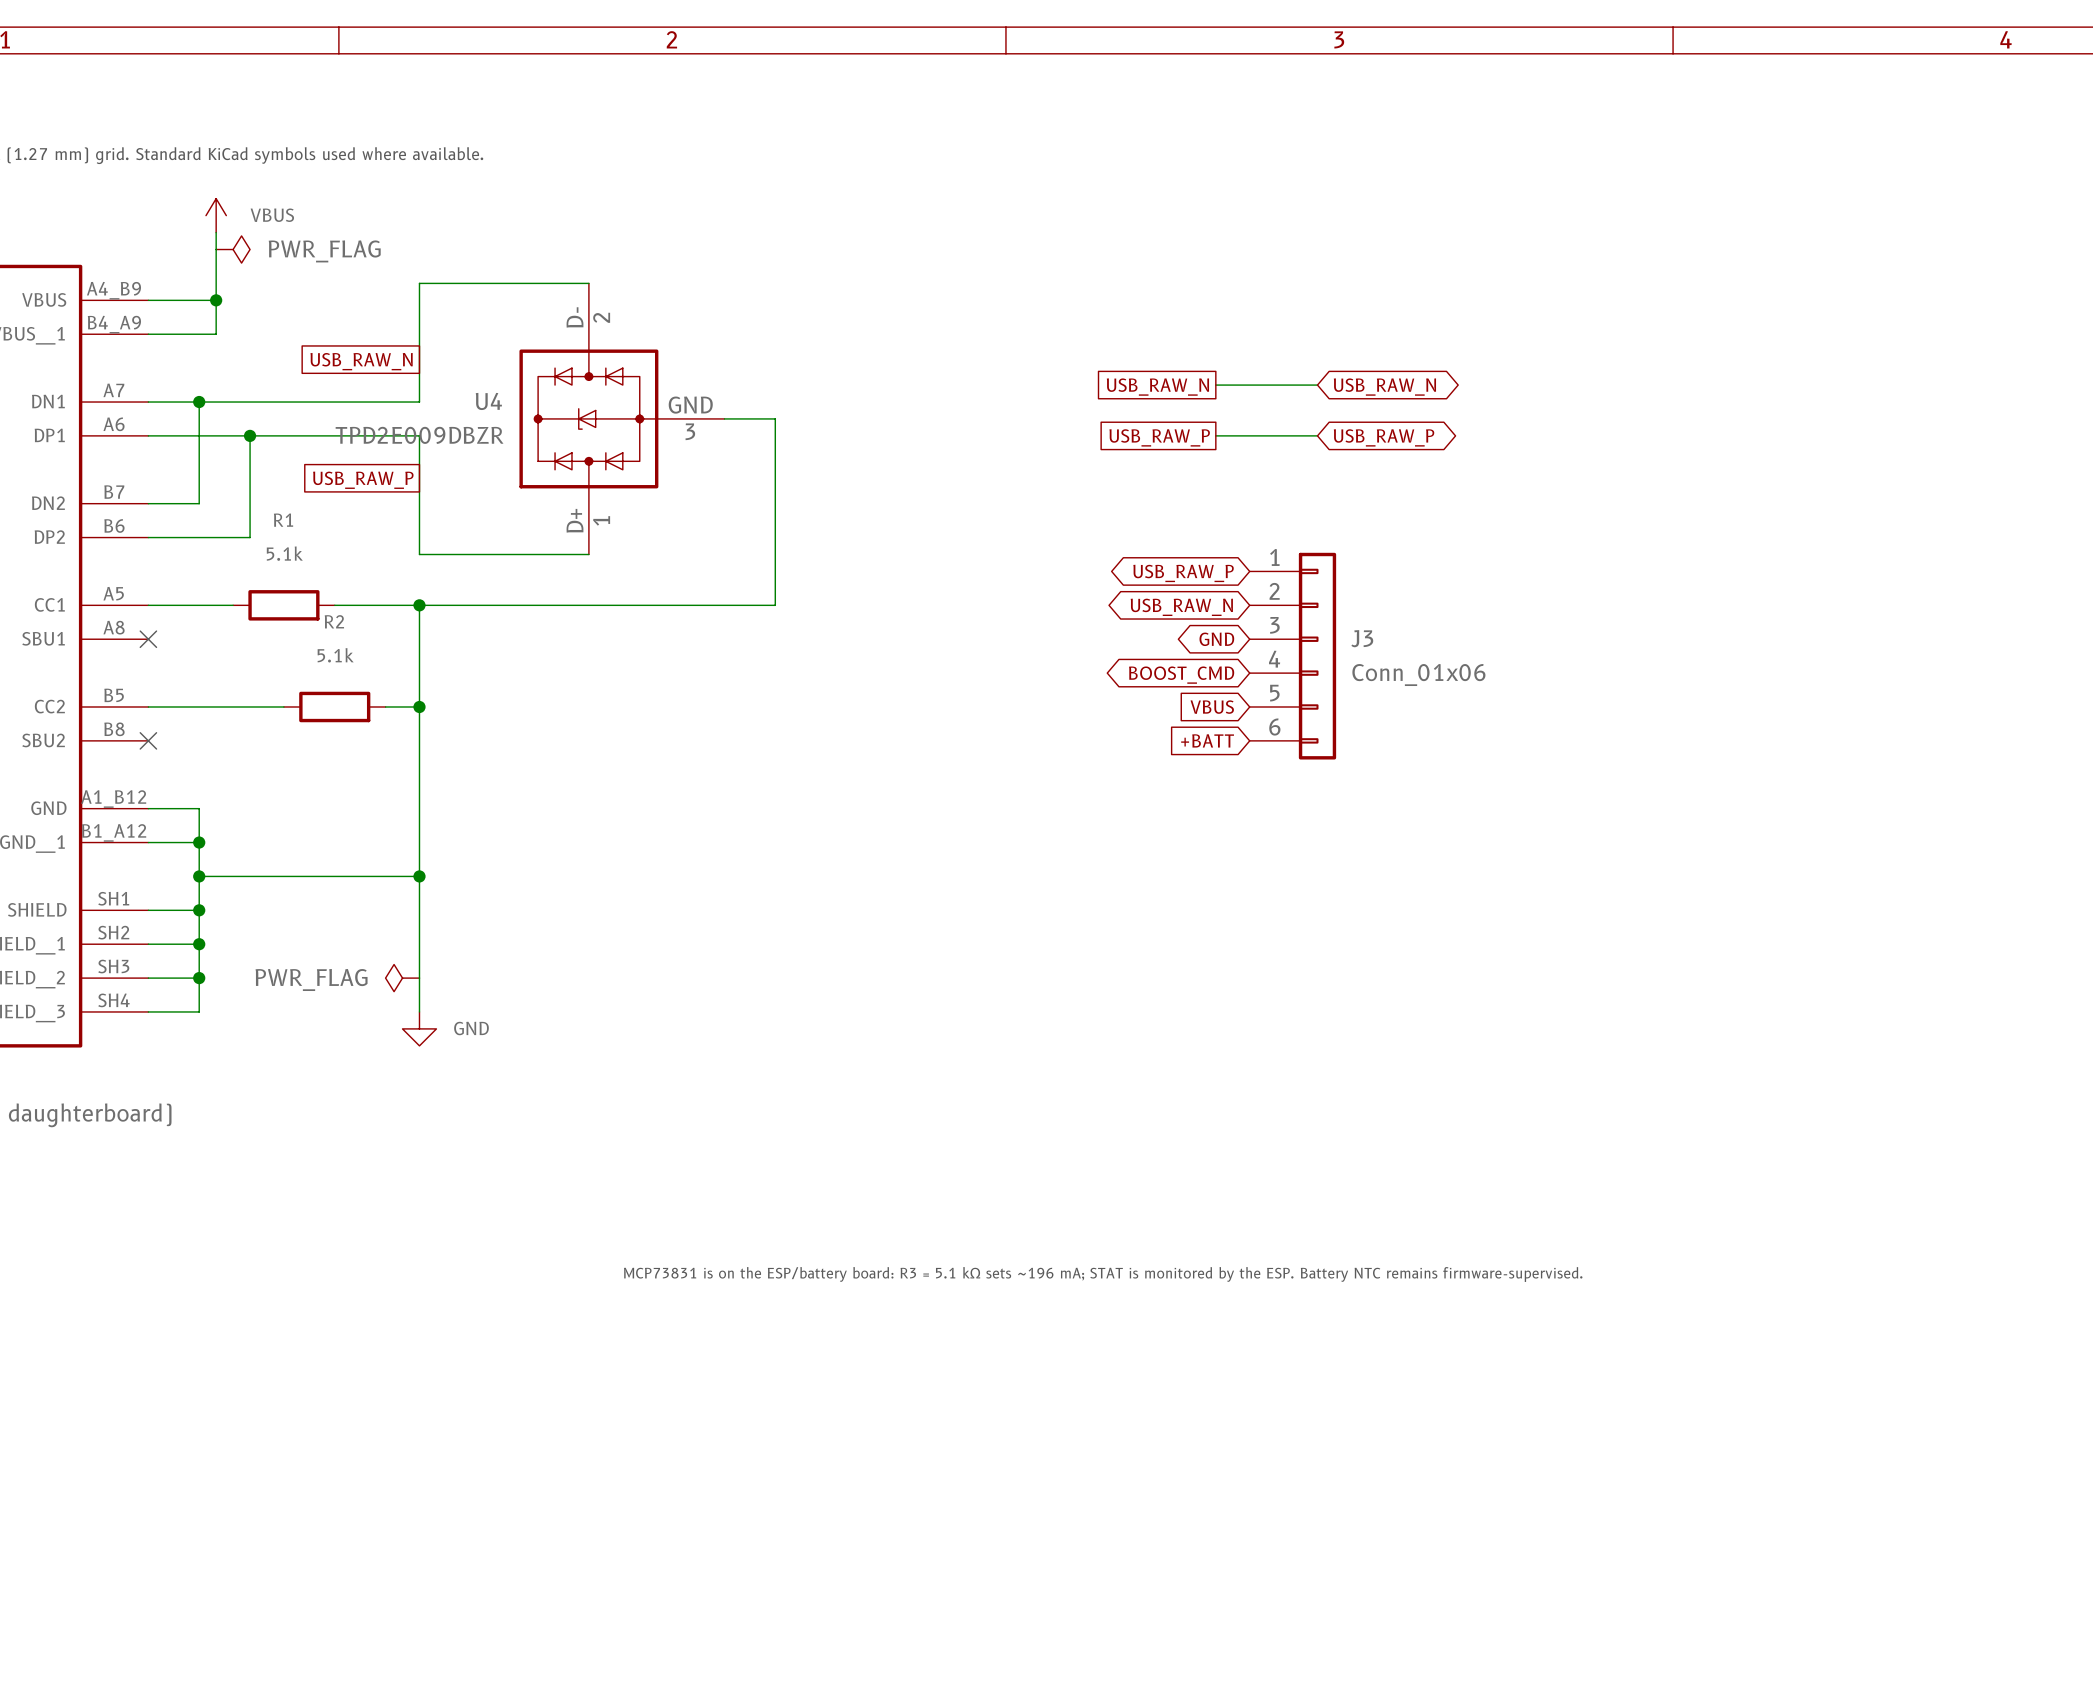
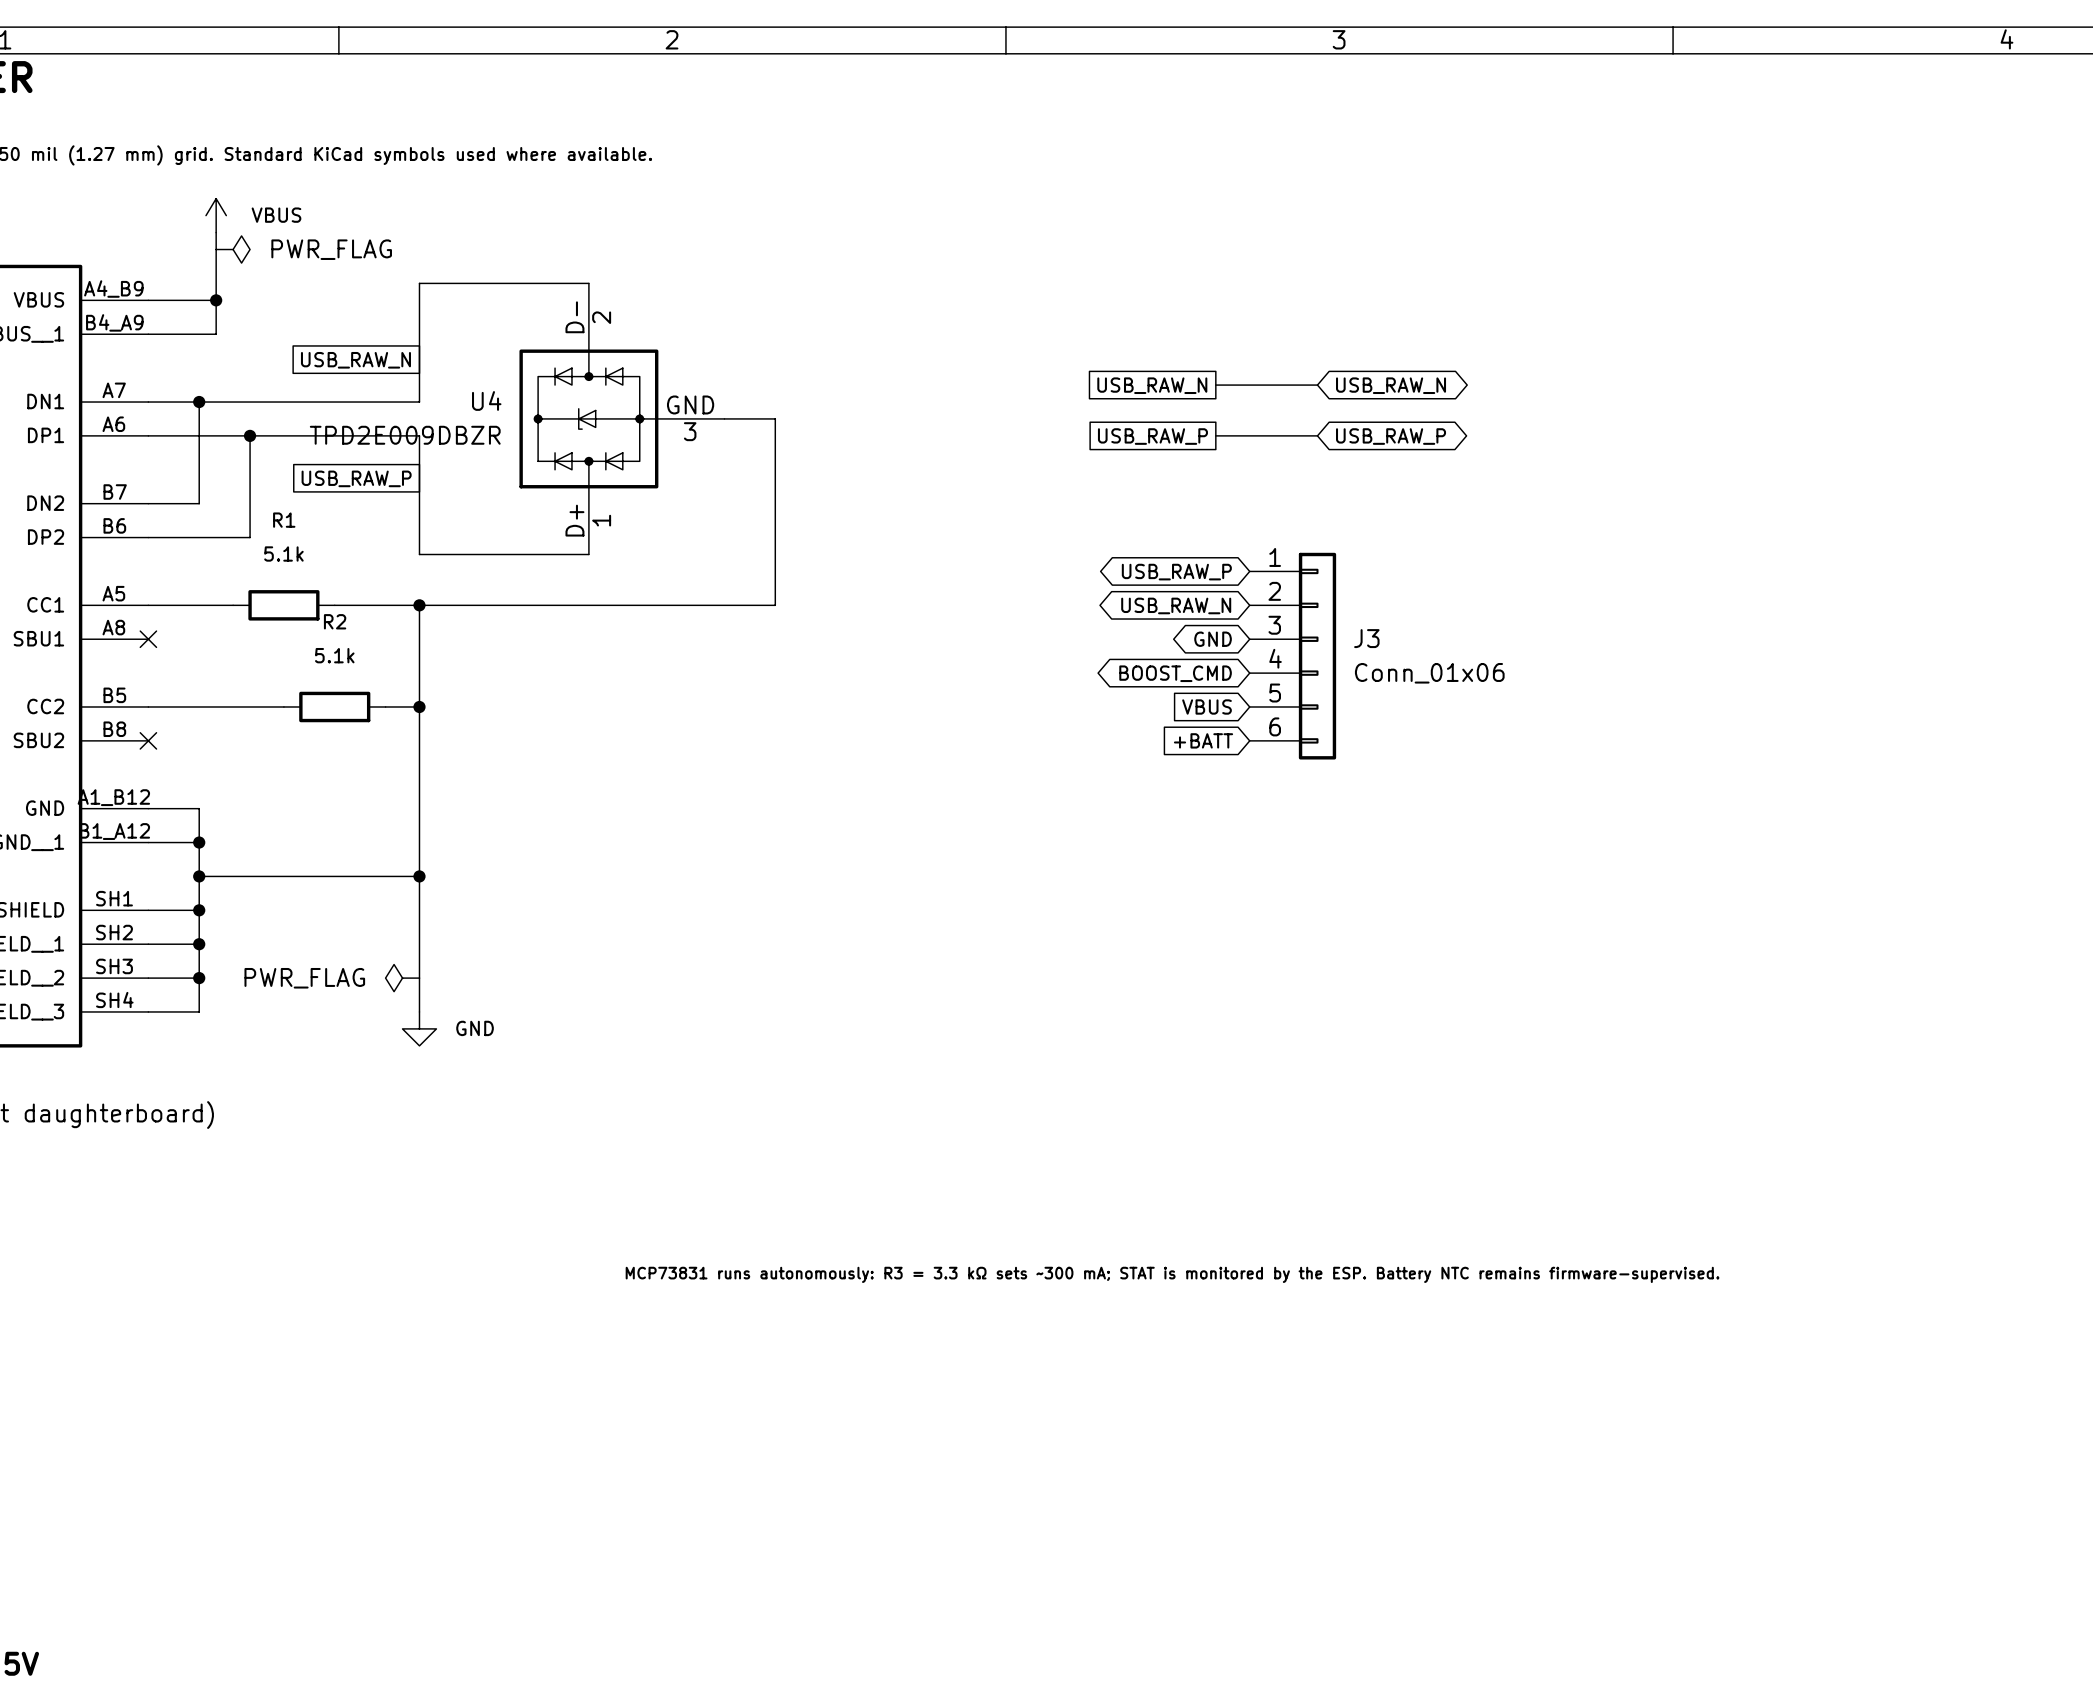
text: MCP73831 is on the ESP/battery board: R3 = 5.1 kΩ sets ~196 mA; STAT is monitored by the ESP. Battery NTC remains firmware-supervised. (1103, 1274) -> MCP73831 runs autonomously: R3 = 3.3 kΩ sets ~300 mA; STAT is monitored by the ESP. Battery NTC remains firmware-supervised. (1172, 1274)

